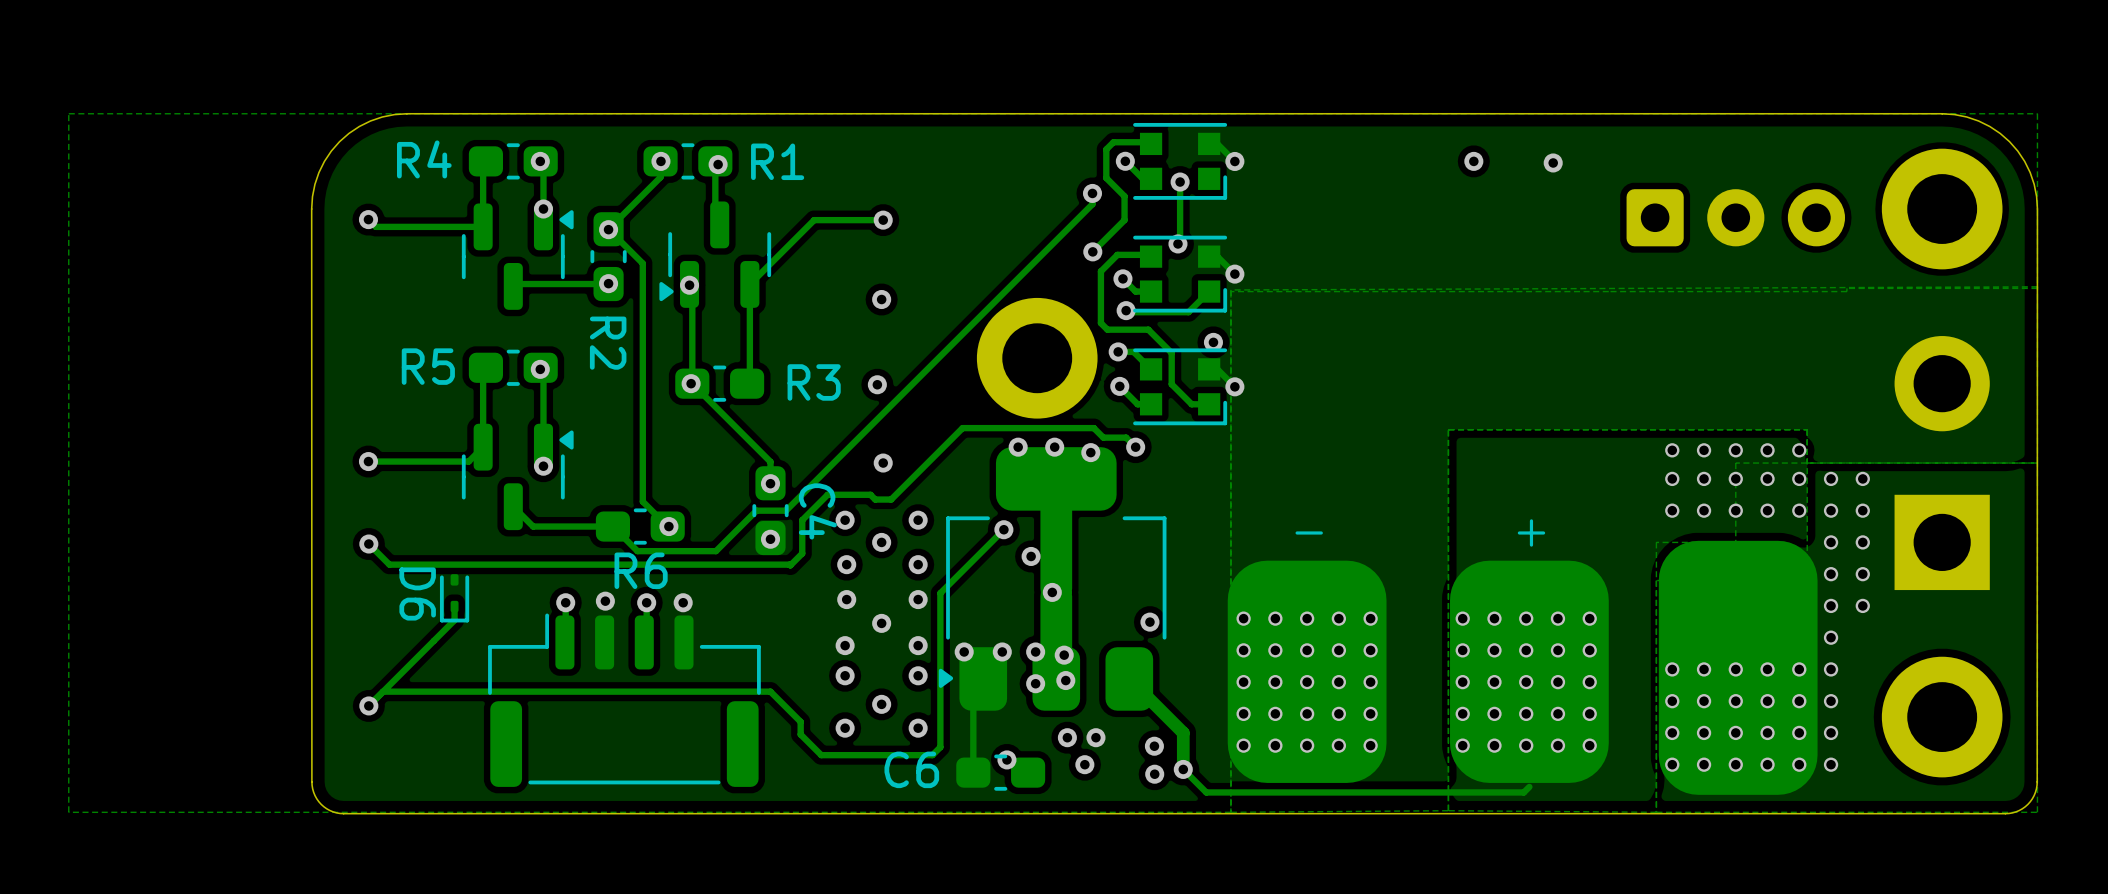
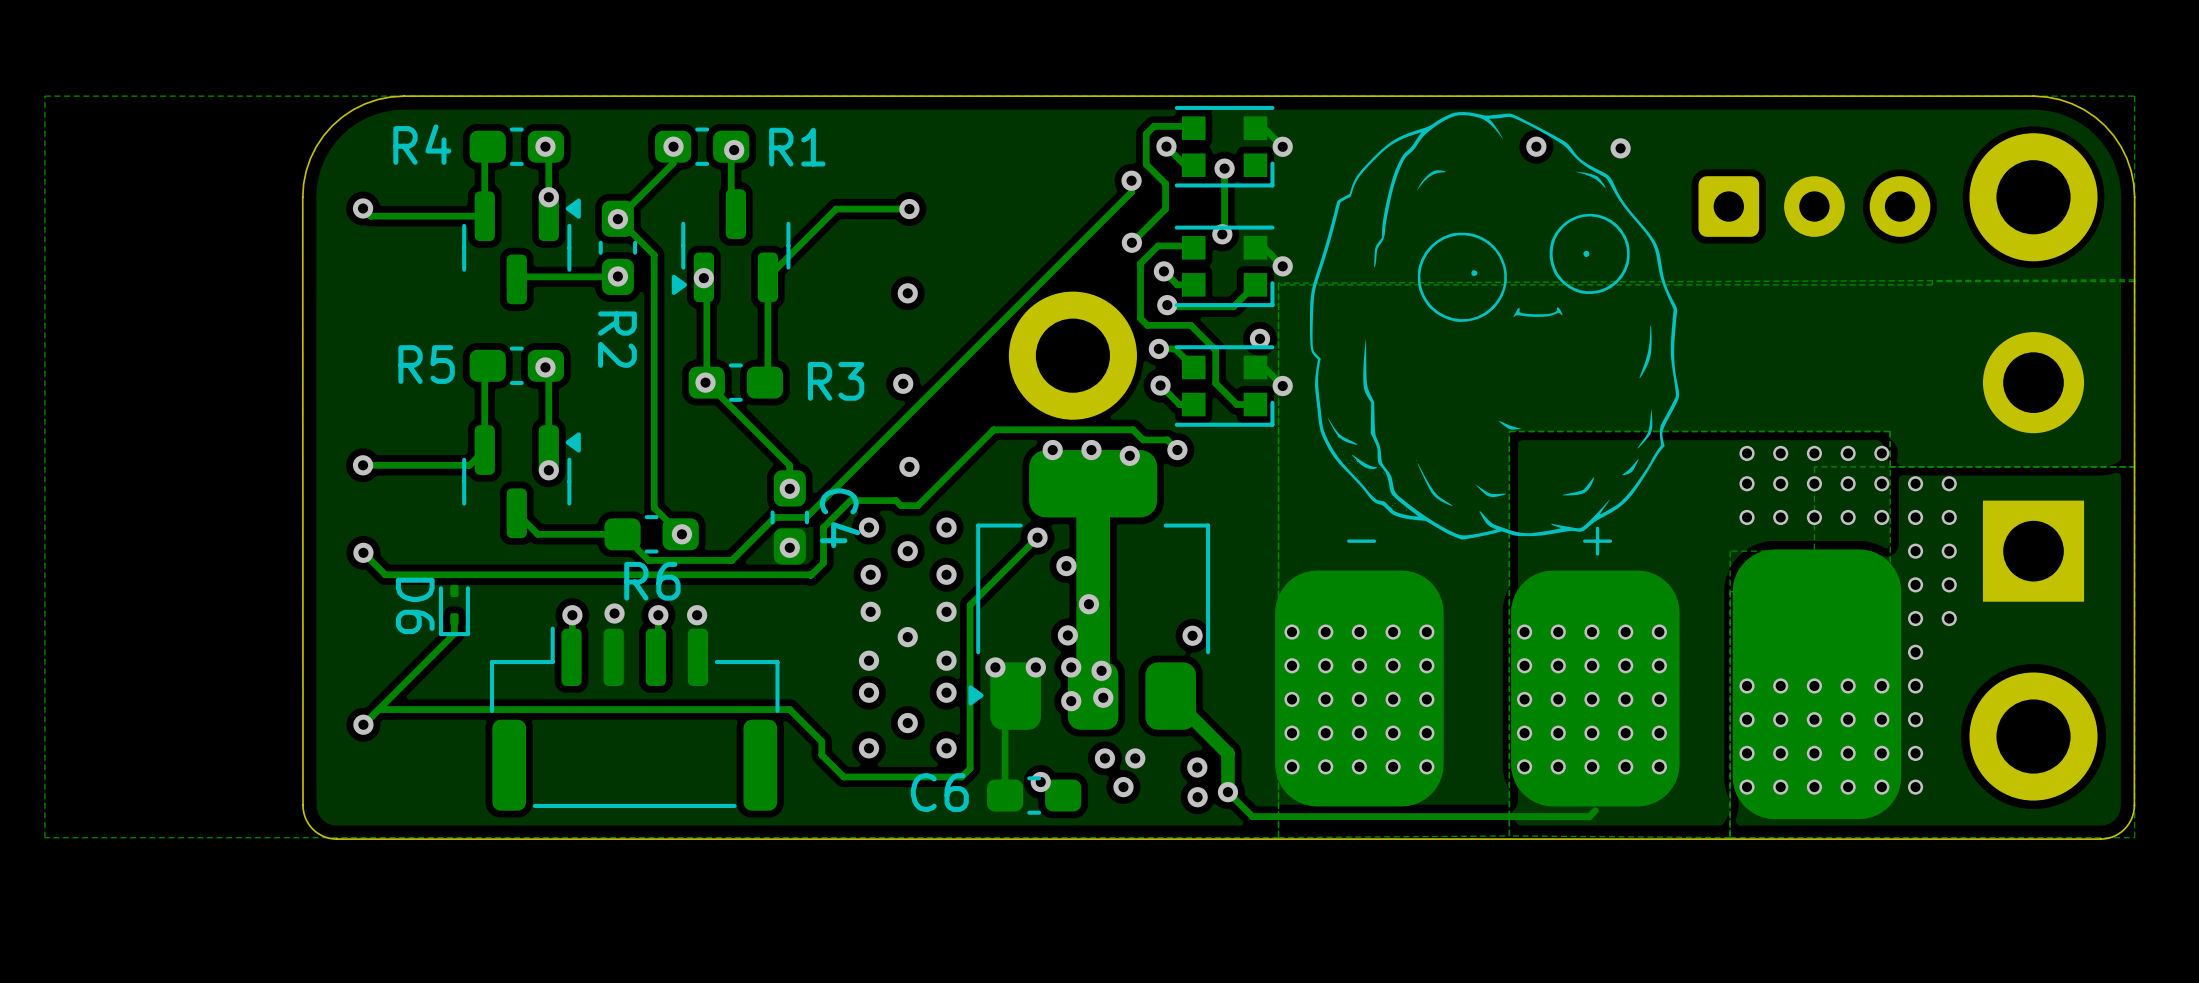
drawing: none -> [1309, 112, 1680, 540]
via: none -> (1067, 635)

